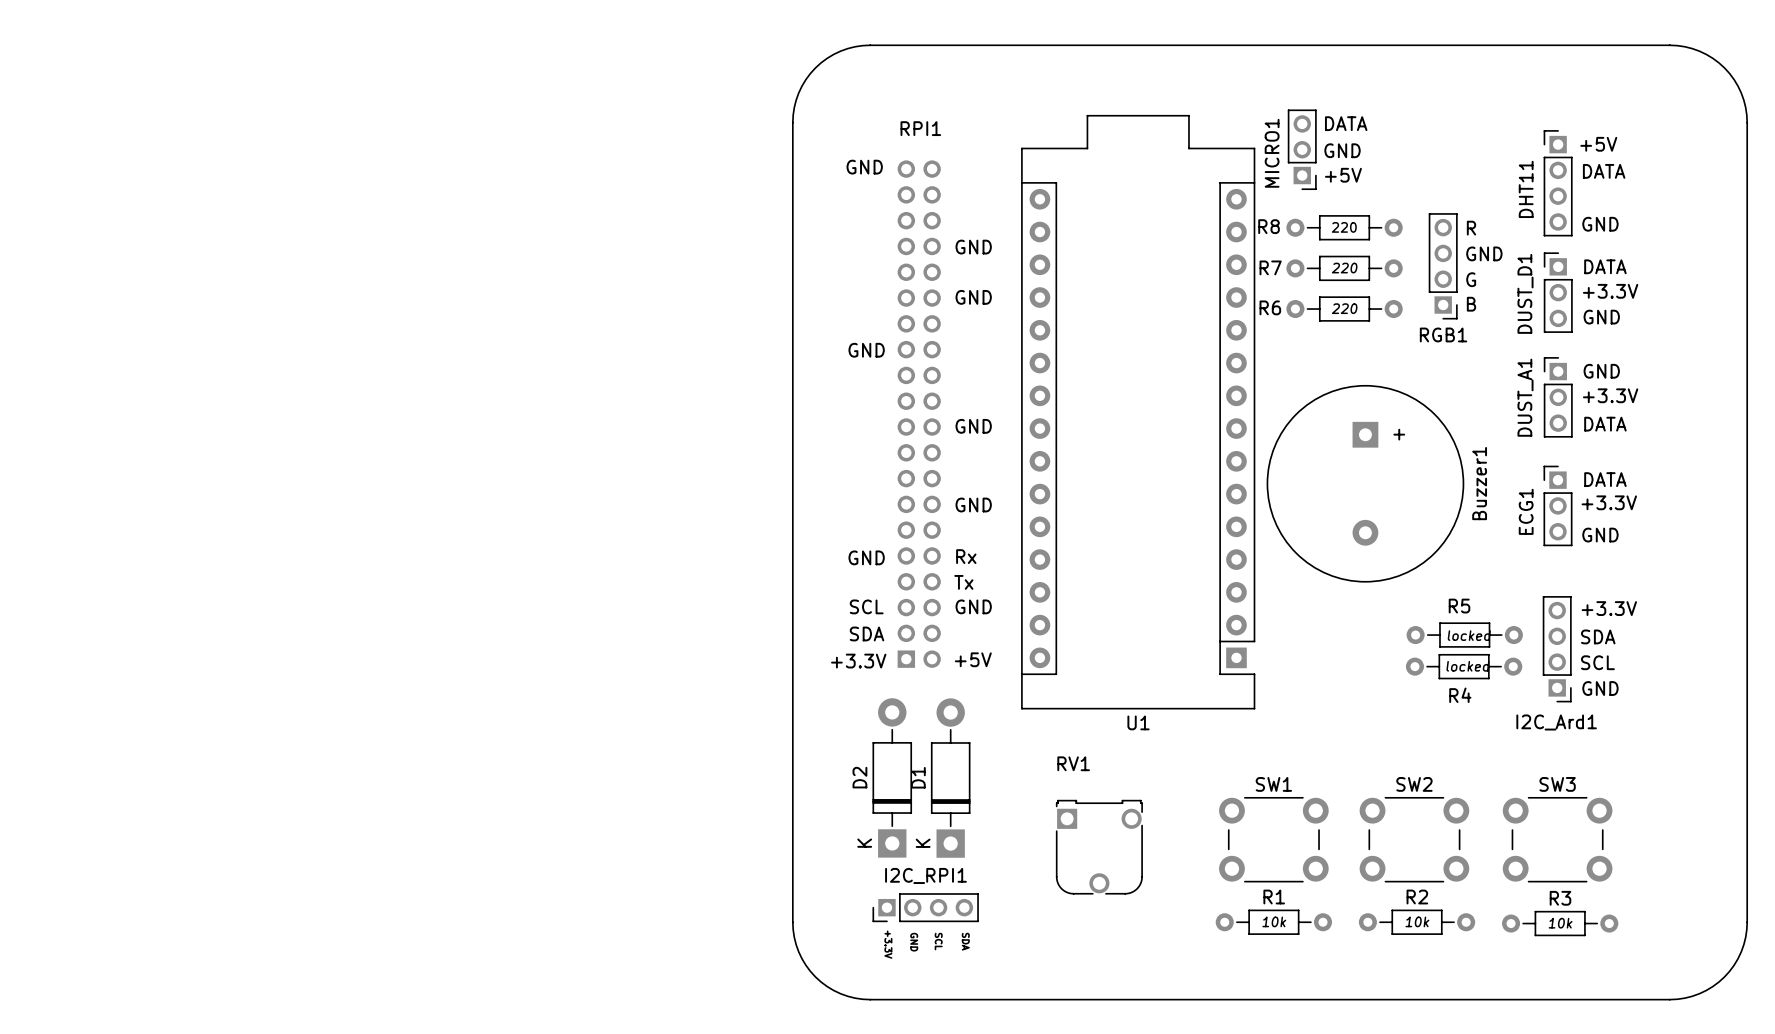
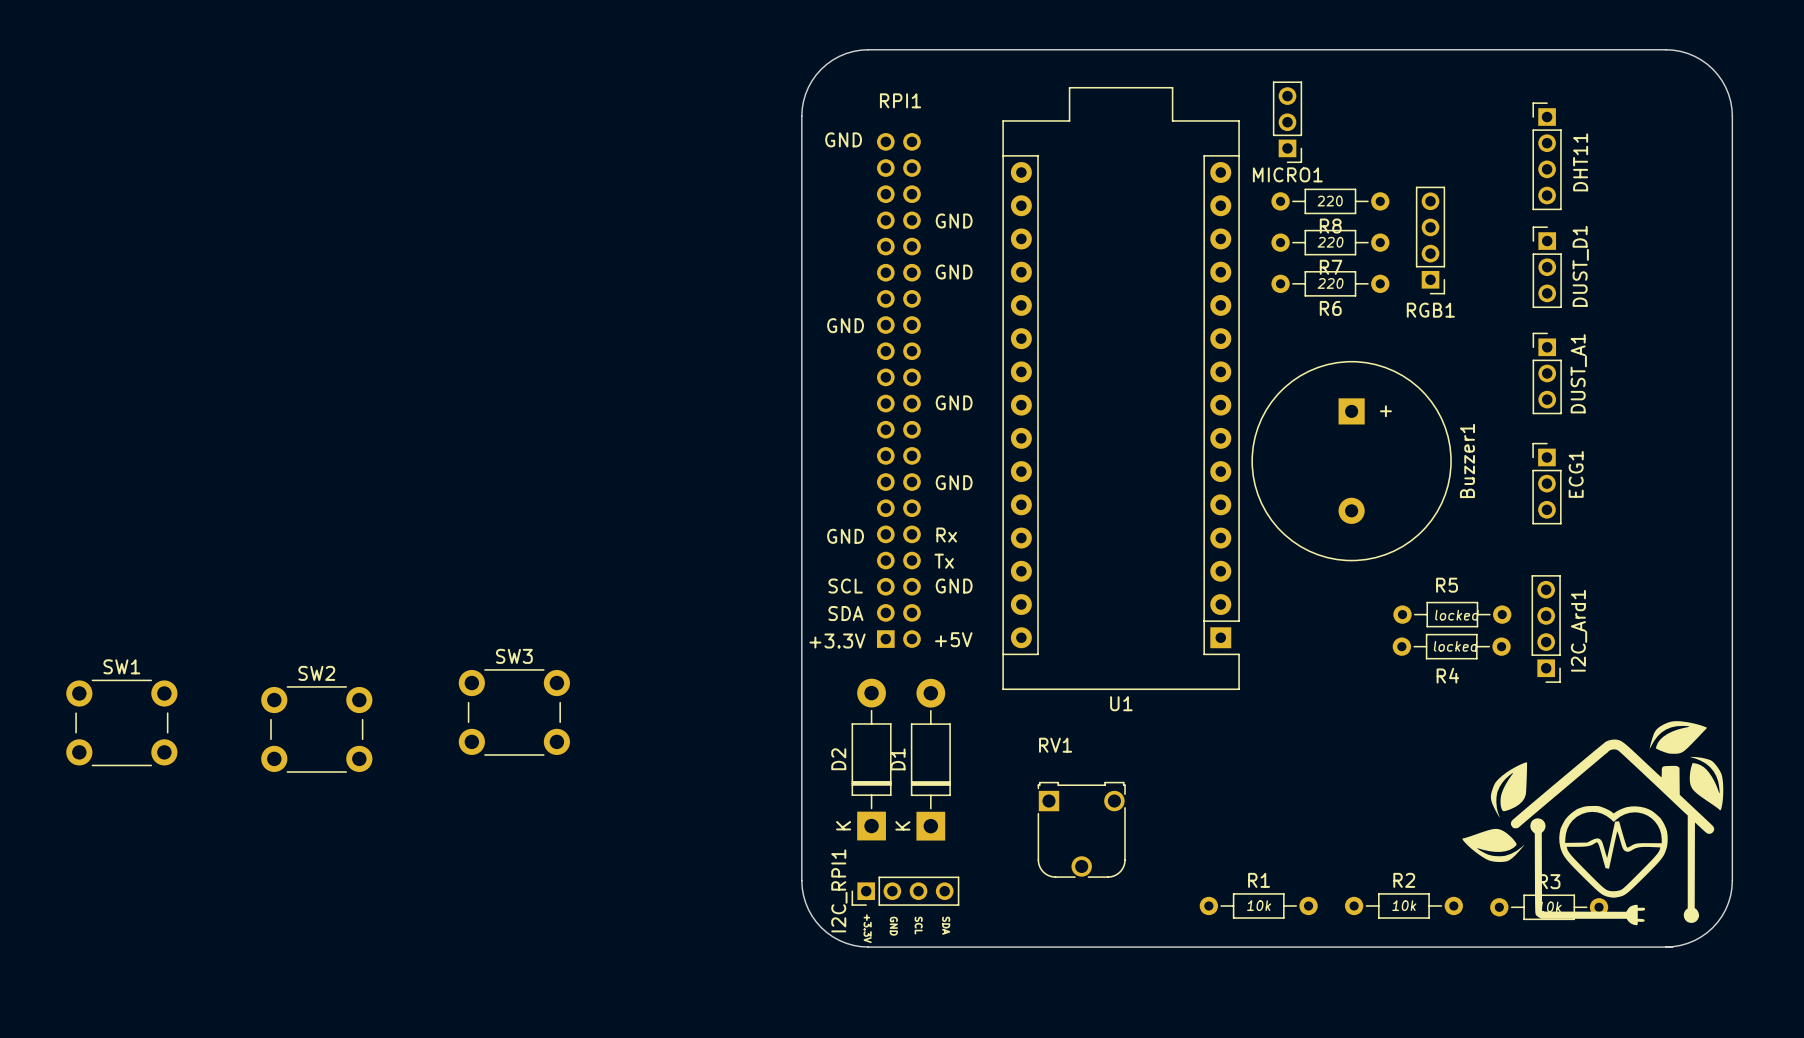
board edge: (870, 45) (1669, 45) (1699, 51) (1724, 67) (1741, 93) (1747, 122) (1747, 922) (1741, 951) (1724, 976) (1699, 993) (1669, 999) (870, 999) (840, 993) (815, 976) (798, 951) (792, 922) (793, 115) (798, 93) (815, 67) (840, 51) (870, 45) -> none
text: DATA (1346, 123) -> none
text: +5V (1598, 144) -> none
text: GND (1342, 150) -> none
MICRO1 name rotation: 0° (1272, 153) -> 90° clockwise (1287, 174)
text: DATA (1604, 171) -> none
text: +5V (1343, 175) -> none
DHT11 name position: DHT11 (1526, 189) -> DHT11 (1580, 162)
text: GND (1600, 224) -> none
R8 name position: R8 (1269, 226) -> R8 (1330, 226)
text: R (1471, 228) -> none
text: GND (1484, 253) -> none
text: DATA (1605, 266) -> none
R7 name position: R7 (1270, 267) -> R7 (1331, 267)
text: G (1471, 279) -> none
text: +3.3V (1610, 291) -> none
DUST_D1 name position: DUST_D1 (1525, 293) -> DUST_D1 (1580, 266)
text: B (1471, 304) -> none
R6 name position: R6 (1270, 307) -> R6 (1330, 308)
text: GND (1601, 317) -> none
text: GND (1601, 371) -> none
text: +3.3V (1610, 395) -> none
DUST_A1 name position: DUST_A1 (1525, 397) -> DUST_A1 (1578, 373)
text: DATA (1605, 424) -> none
text: DATA (1605, 479) -> none
text: +3.3V (1609, 502) -> none
ECG1 name position: ECG1 (1526, 511) -> ECG1 (1576, 474)
text: GND (1600, 535) -> none
text: +3.3V (1609, 608) -> none
text: SDA (1598, 636) -> none
text: SCL (1597, 662) -> none
text: GND (1600, 688) -> none
I2C_Ard1 name rotation: 0° (1556, 722) -> 90° counterclockwise (1579, 630)
drawing: none -> [1462, 721, 1724, 926]
SW1 position: (1273, 839) -> (121, 722)
SW2 position: (1414, 839) -> (316, 729)
SW3 position: (1557, 839) -> (514, 712)
I2C_RPI1 name rotation: 0° (925, 875) -> 90° counterclockwise (839, 890)
board edge: none -> (1665, 947) (1673, 946) (1687, 943) (1701, 936) (1712, 927) (1725, 909) (1730, 895) (1732, 880) (1732, 116) (1728, 94) (1722, 80) (1712, 69) (1694, 56) (1680, 51) (1665, 49) (868, 49) (853, 51) (839, 56) (821, 69) (808, 87) (803, 101) (801, 116) (801, 880) (805, 902) (812, 915) (821, 927) (832, 936) (846, 943) (868, 947) (1672, 947)

